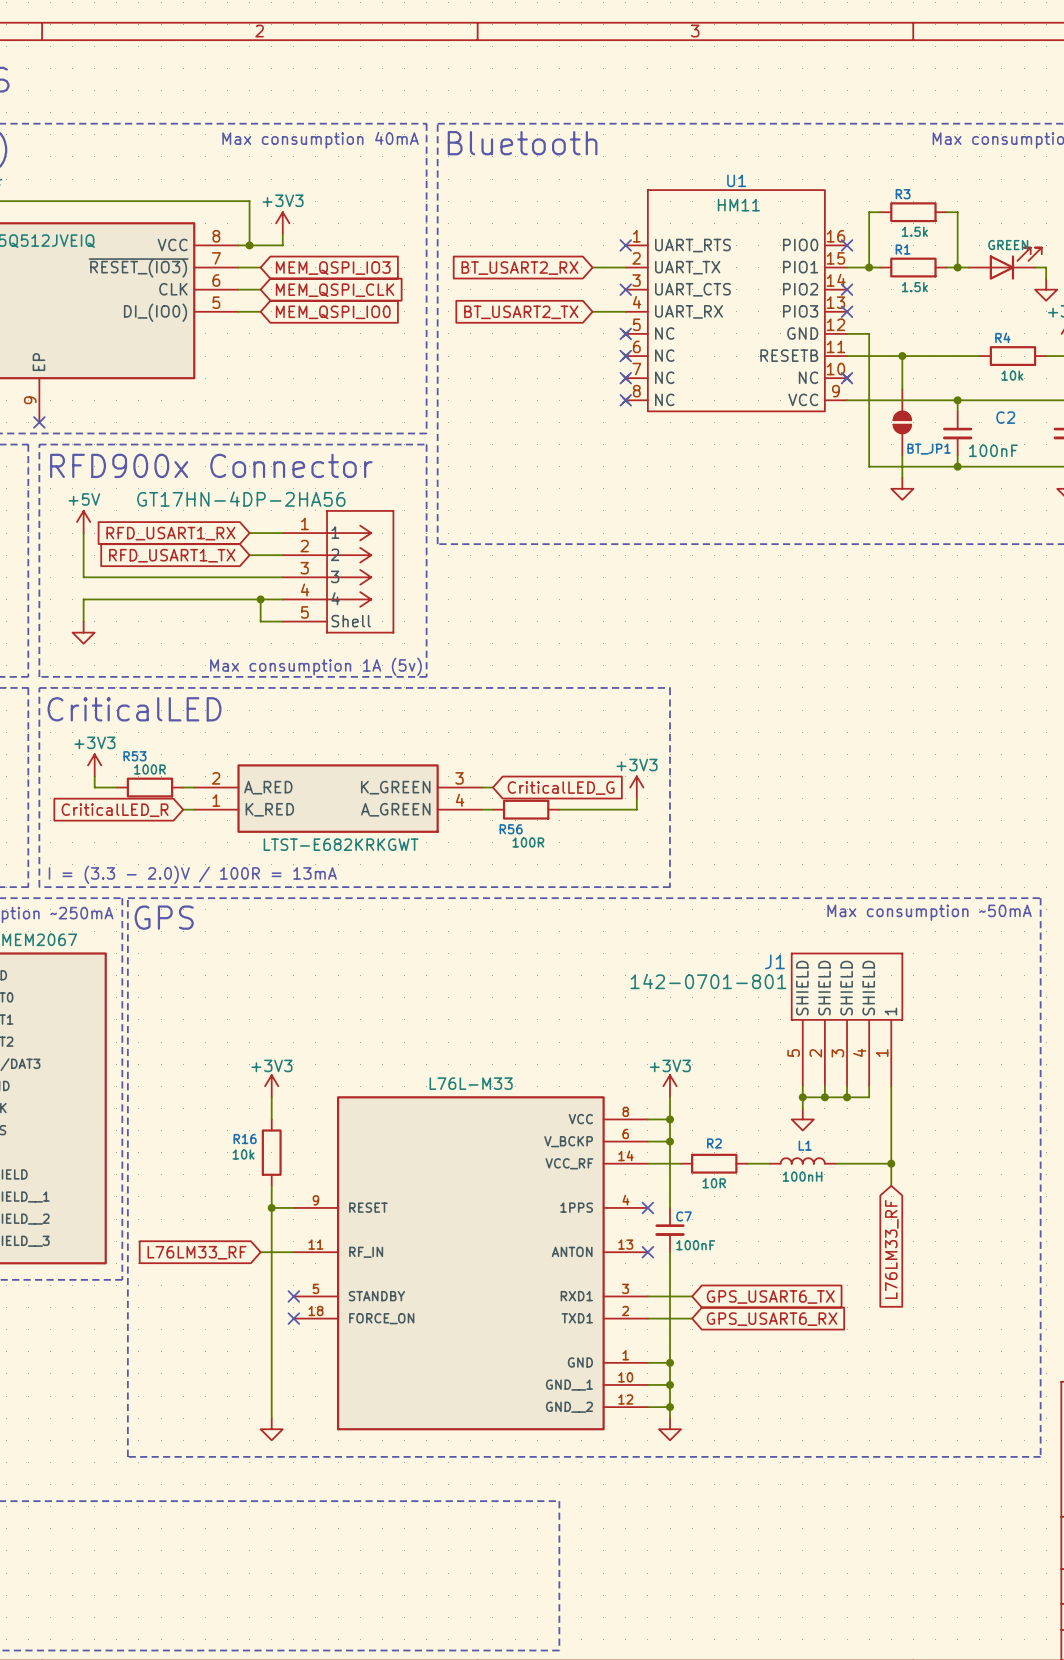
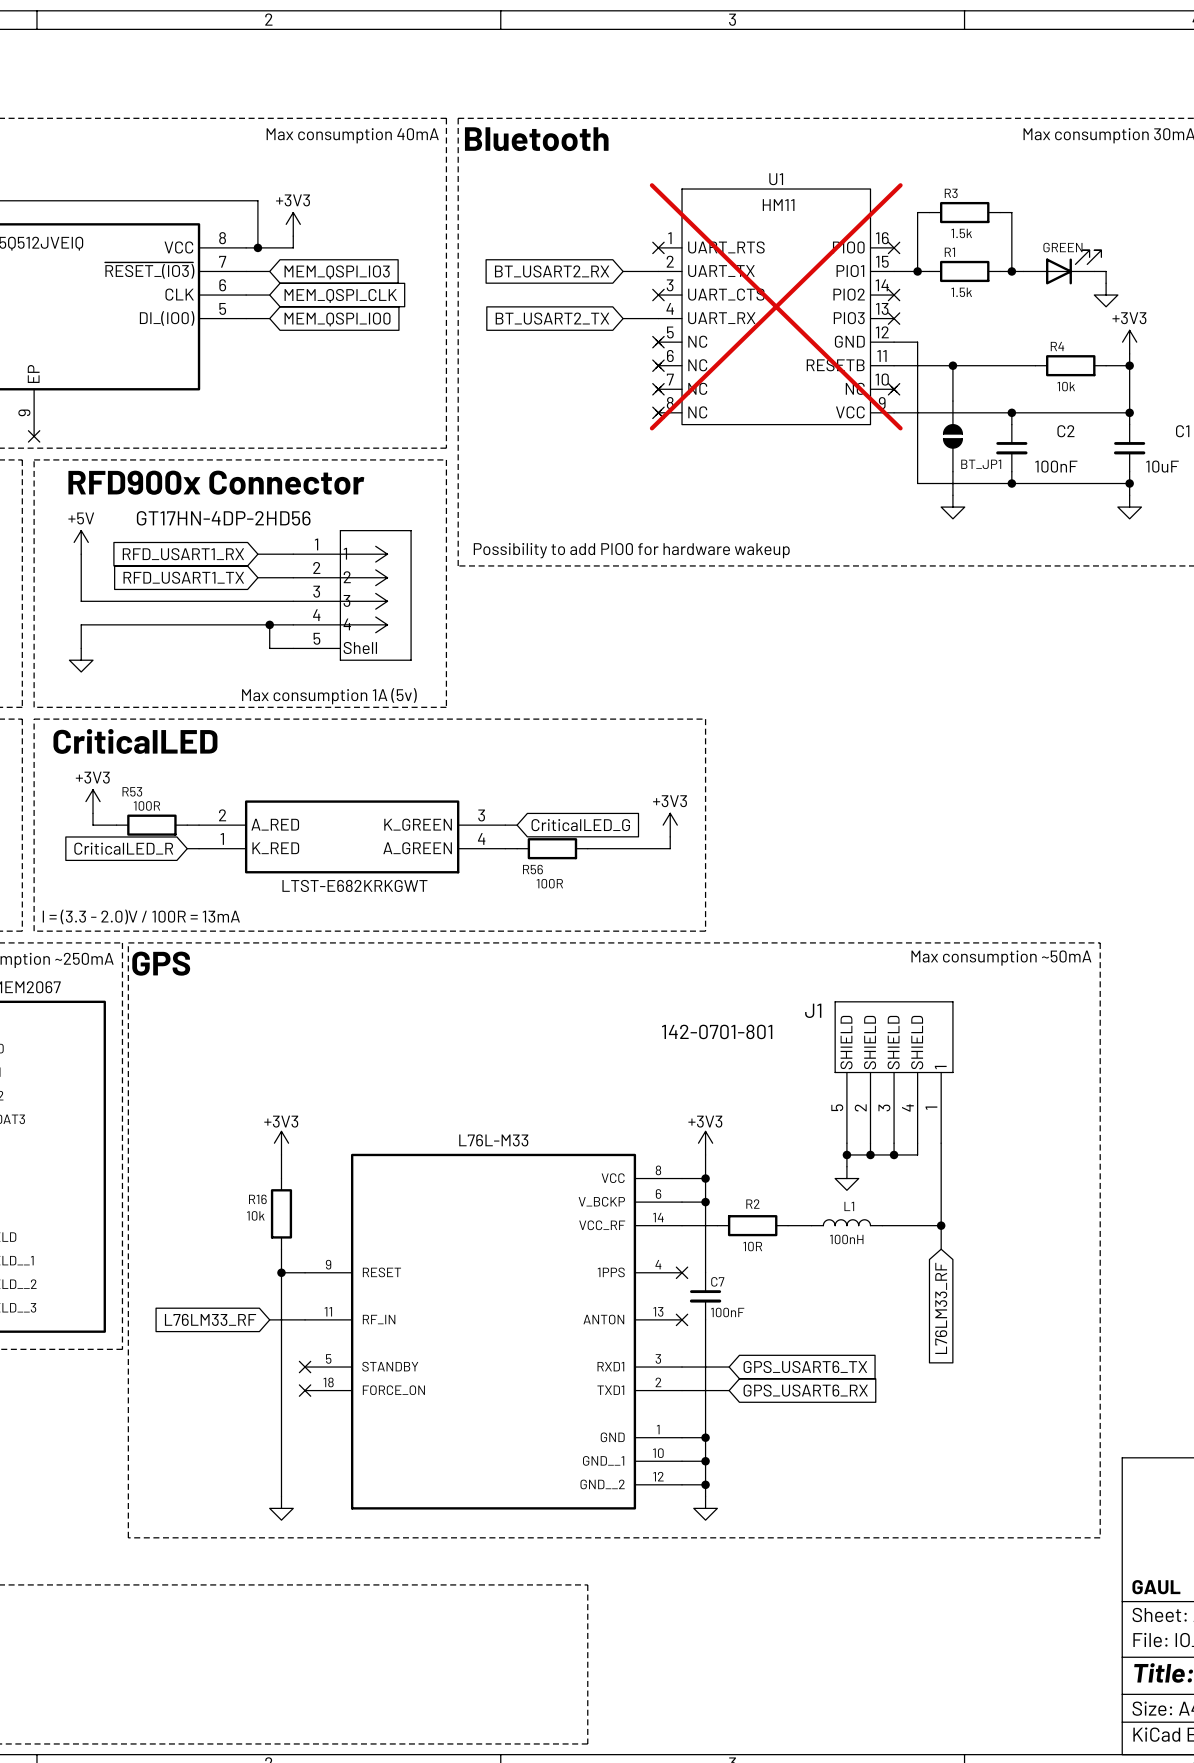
U1 do-not-place cross: none -> (776, 306)
part value: GT17HN-4DP-2HA56 (241, 499) -> GT17HN-4DP-2HD56 (223, 518)
text: none -> Possibility to add PIO0 for hardware wakeup (631, 550)

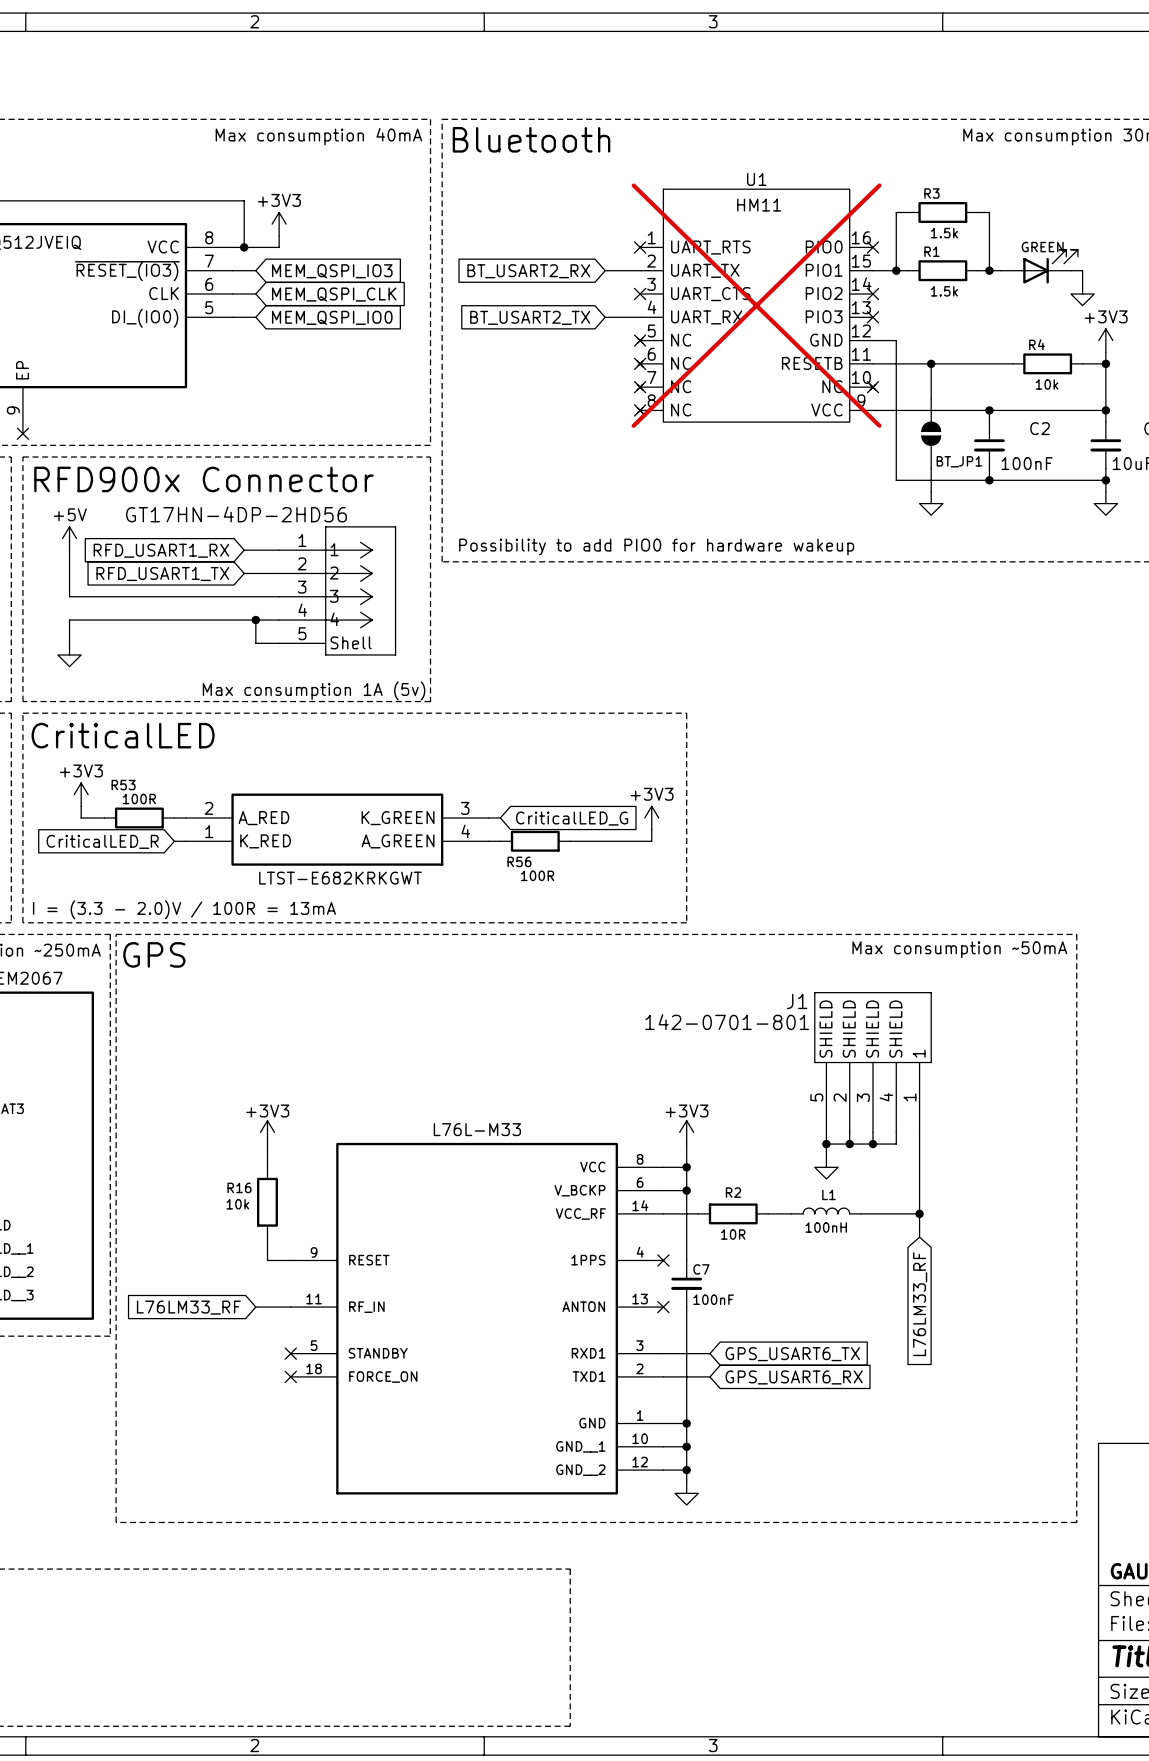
wire: (281, 1272) (281, 1496) -> none
junction: (281, 1272) -> none
power symbol: (281, 1508) -> none

